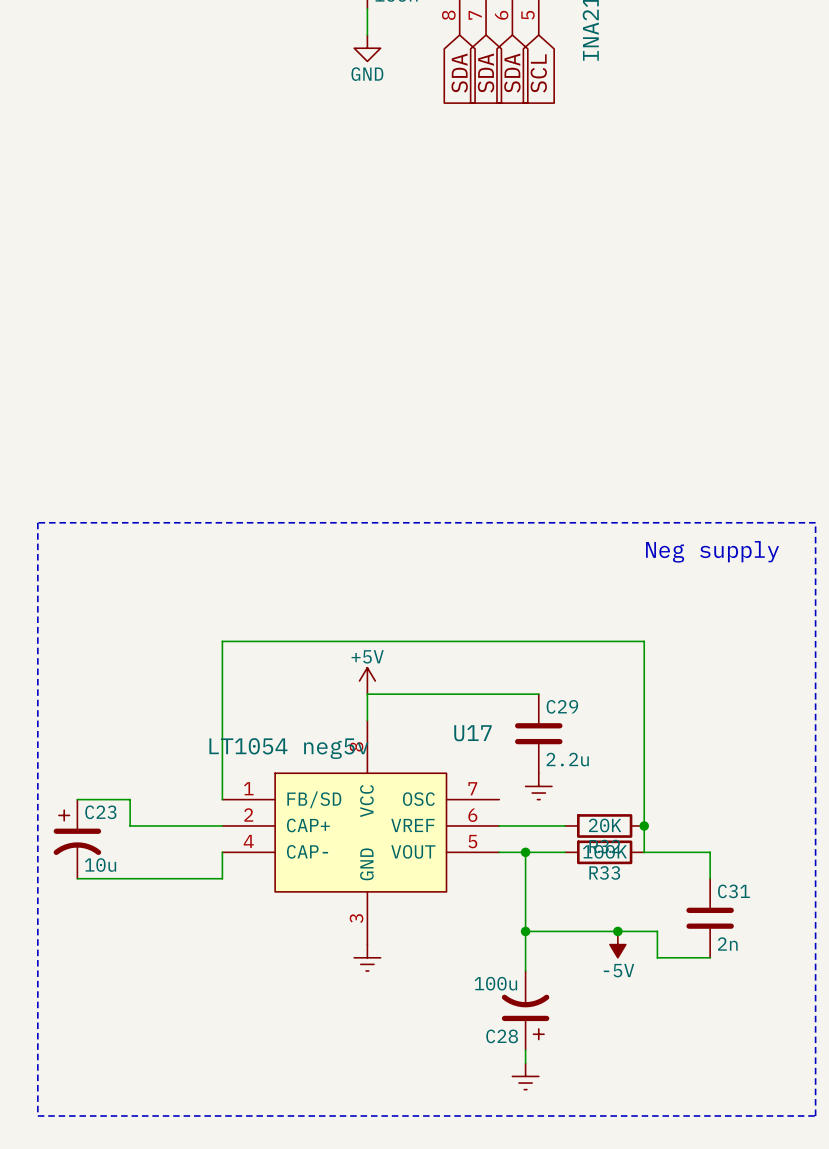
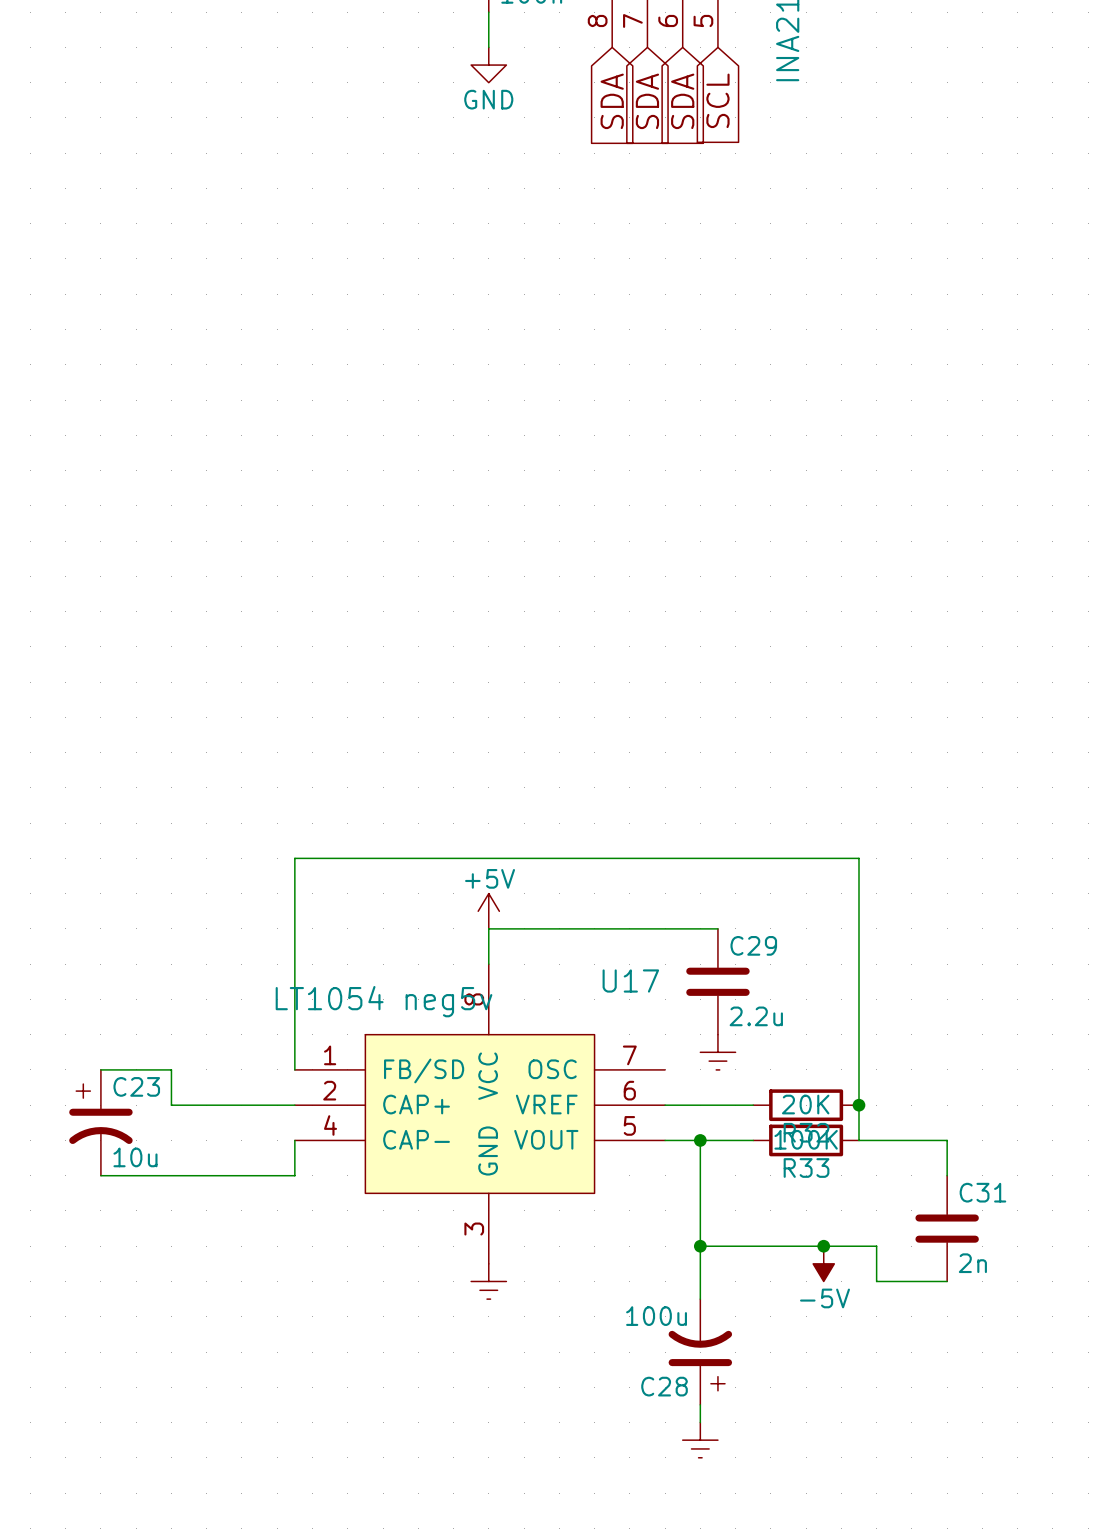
line: (37, 522) (37, 1115) (815, 1115) (815, 522) (37, 522) -> none
text: Neg supply (712, 551) -> none

